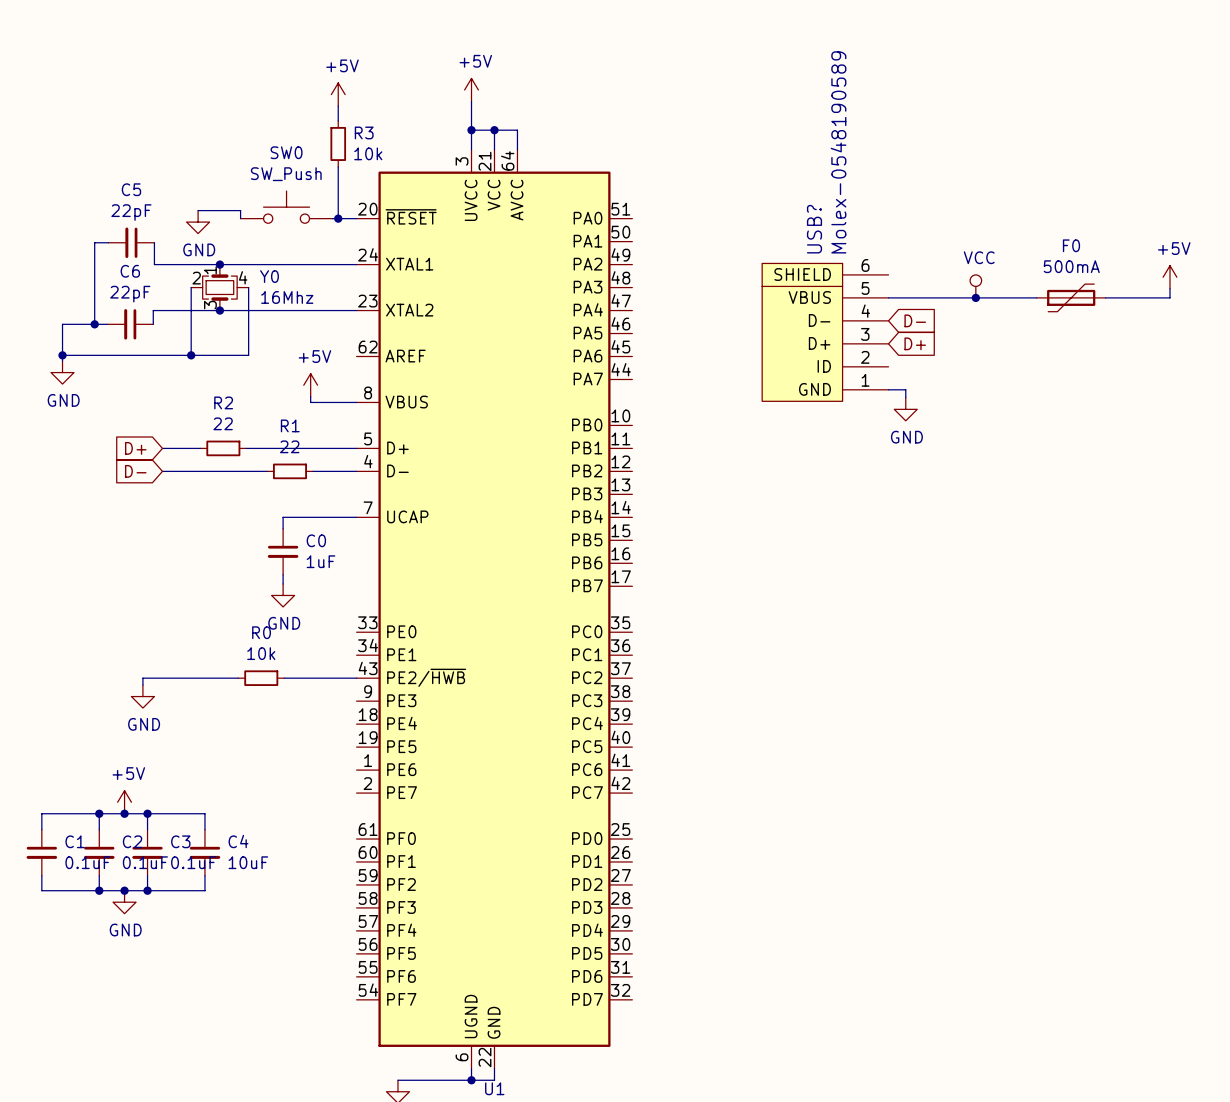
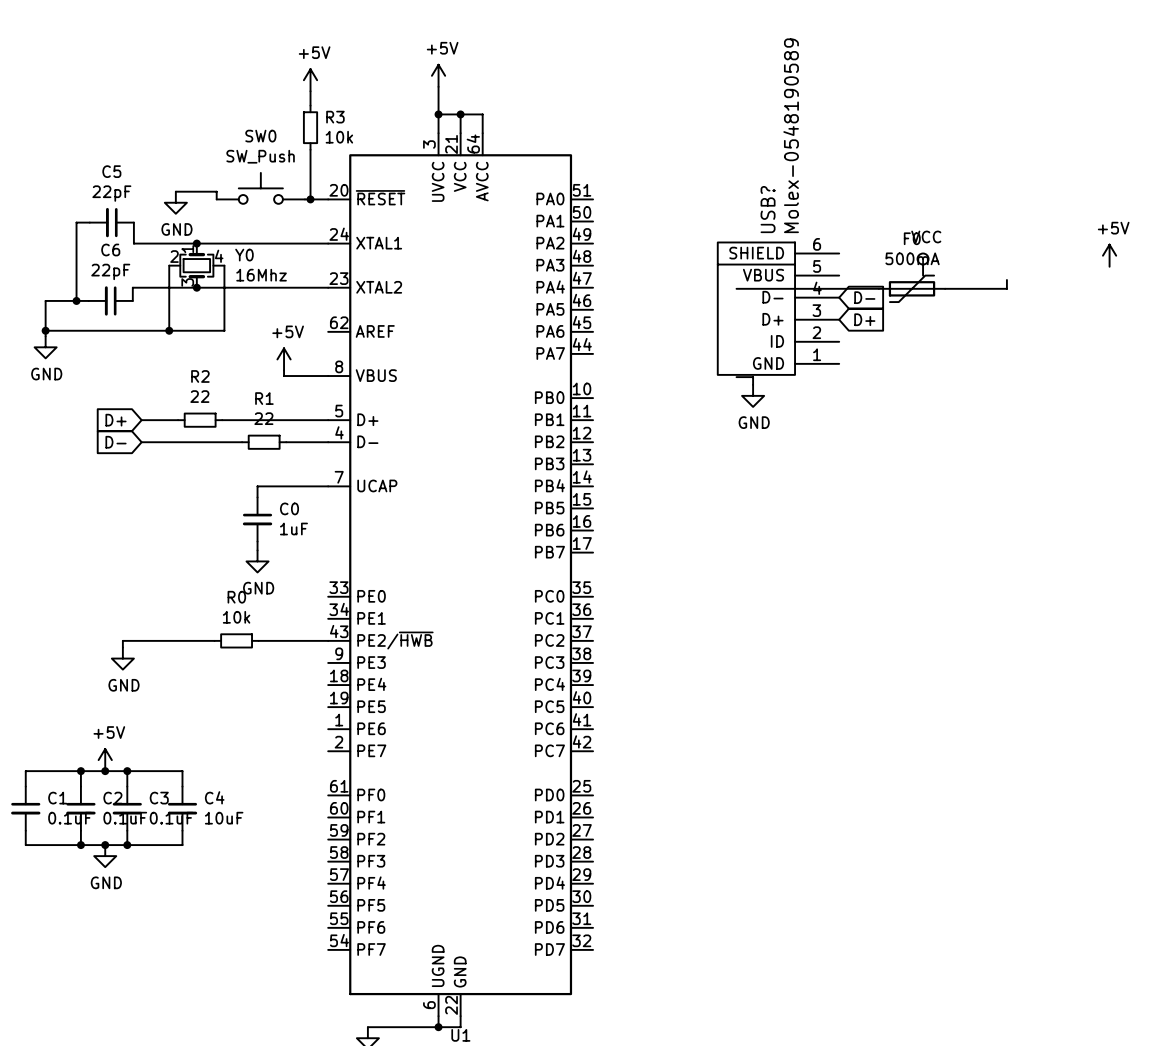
wire: (1170, 288) (1170, 297) (1105, 297) -> (1006, 279) (1006, 288) (945, 288)
wire: (888, 297) (1036, 297) -> (736, 288) (878, 288)
junction: (975, 297) -> none
F0 position: (1071, 297) -> (912, 288)
wire: (888, 389) (905, 389) (905, 397) -> (736, 377) (753, 377) (753, 384)
power symbol position: GND (905, 409) -> GND (753, 395)

